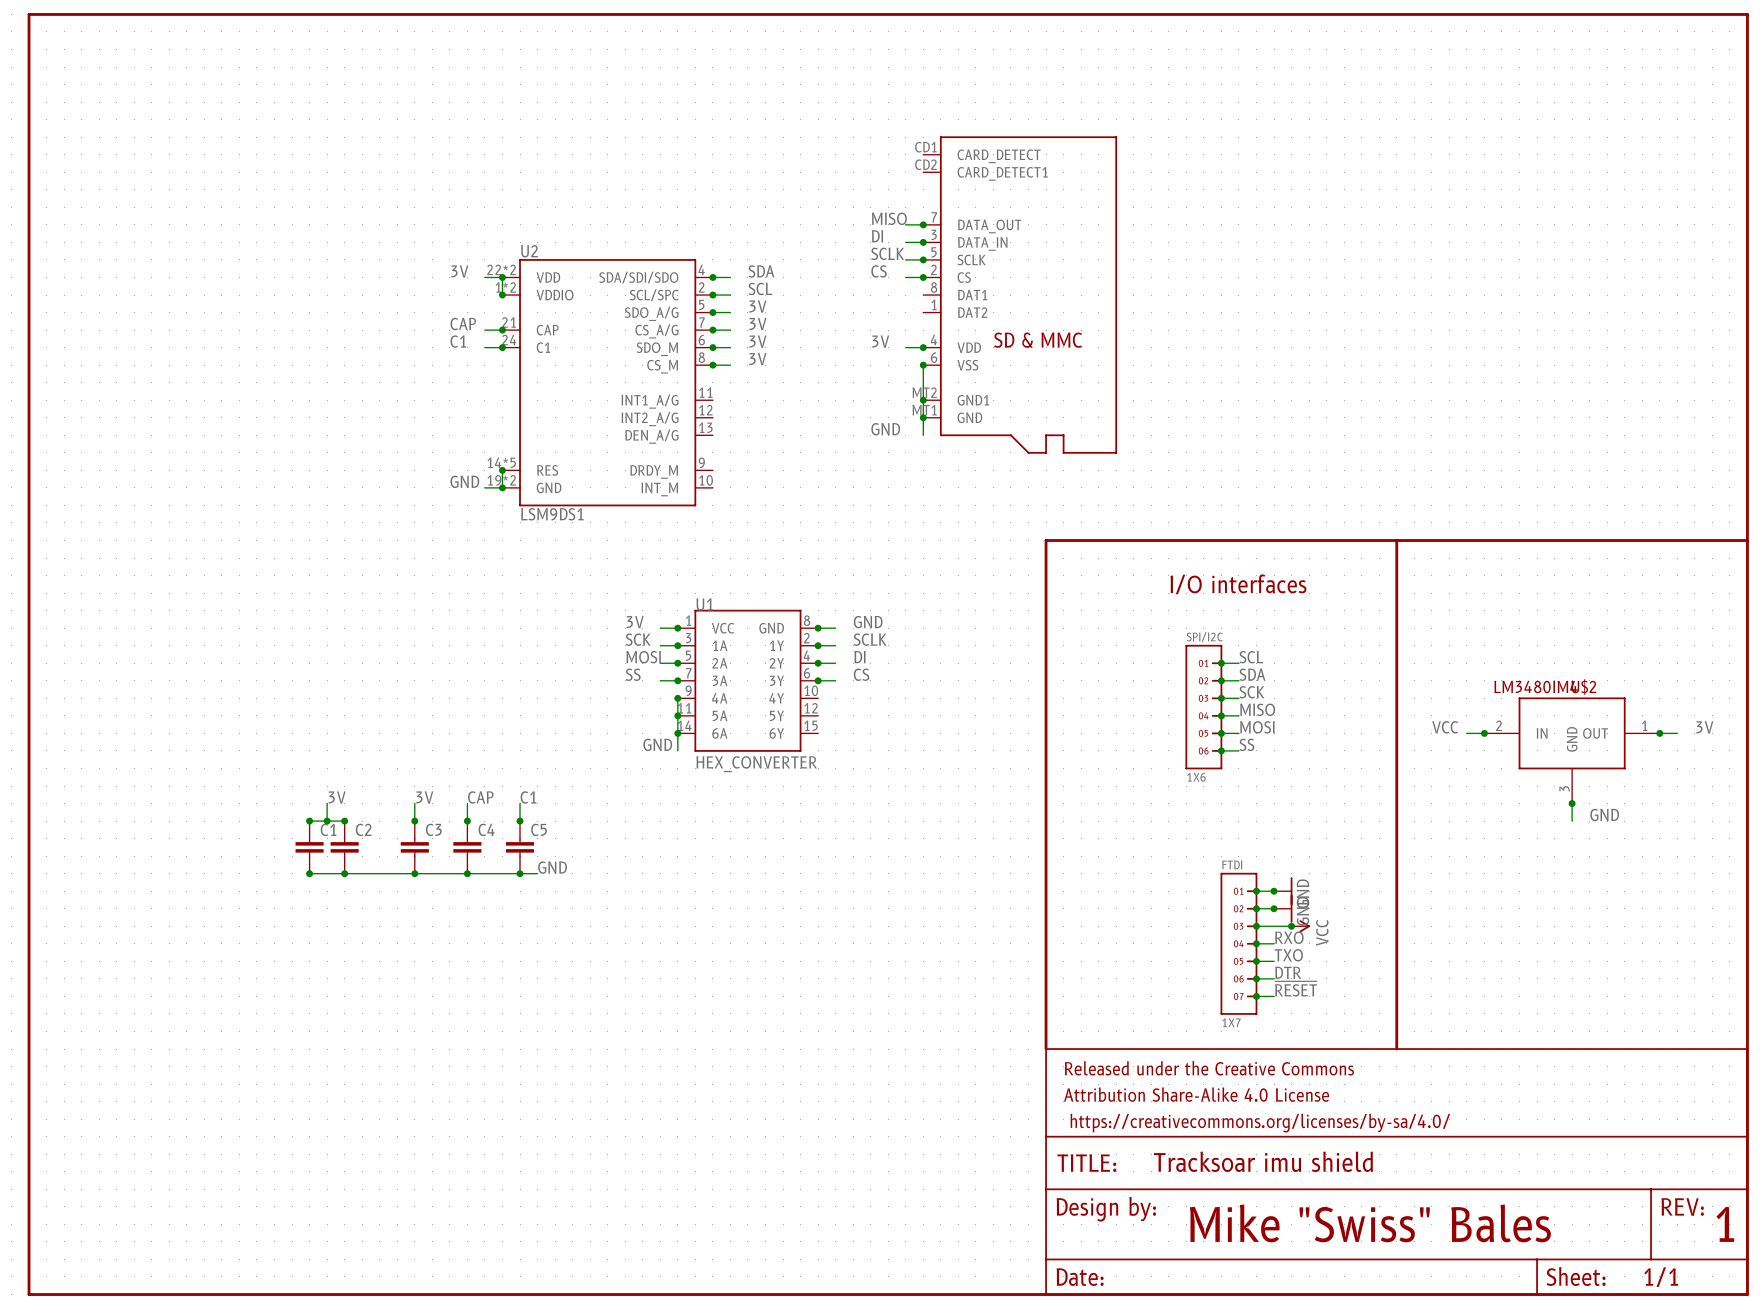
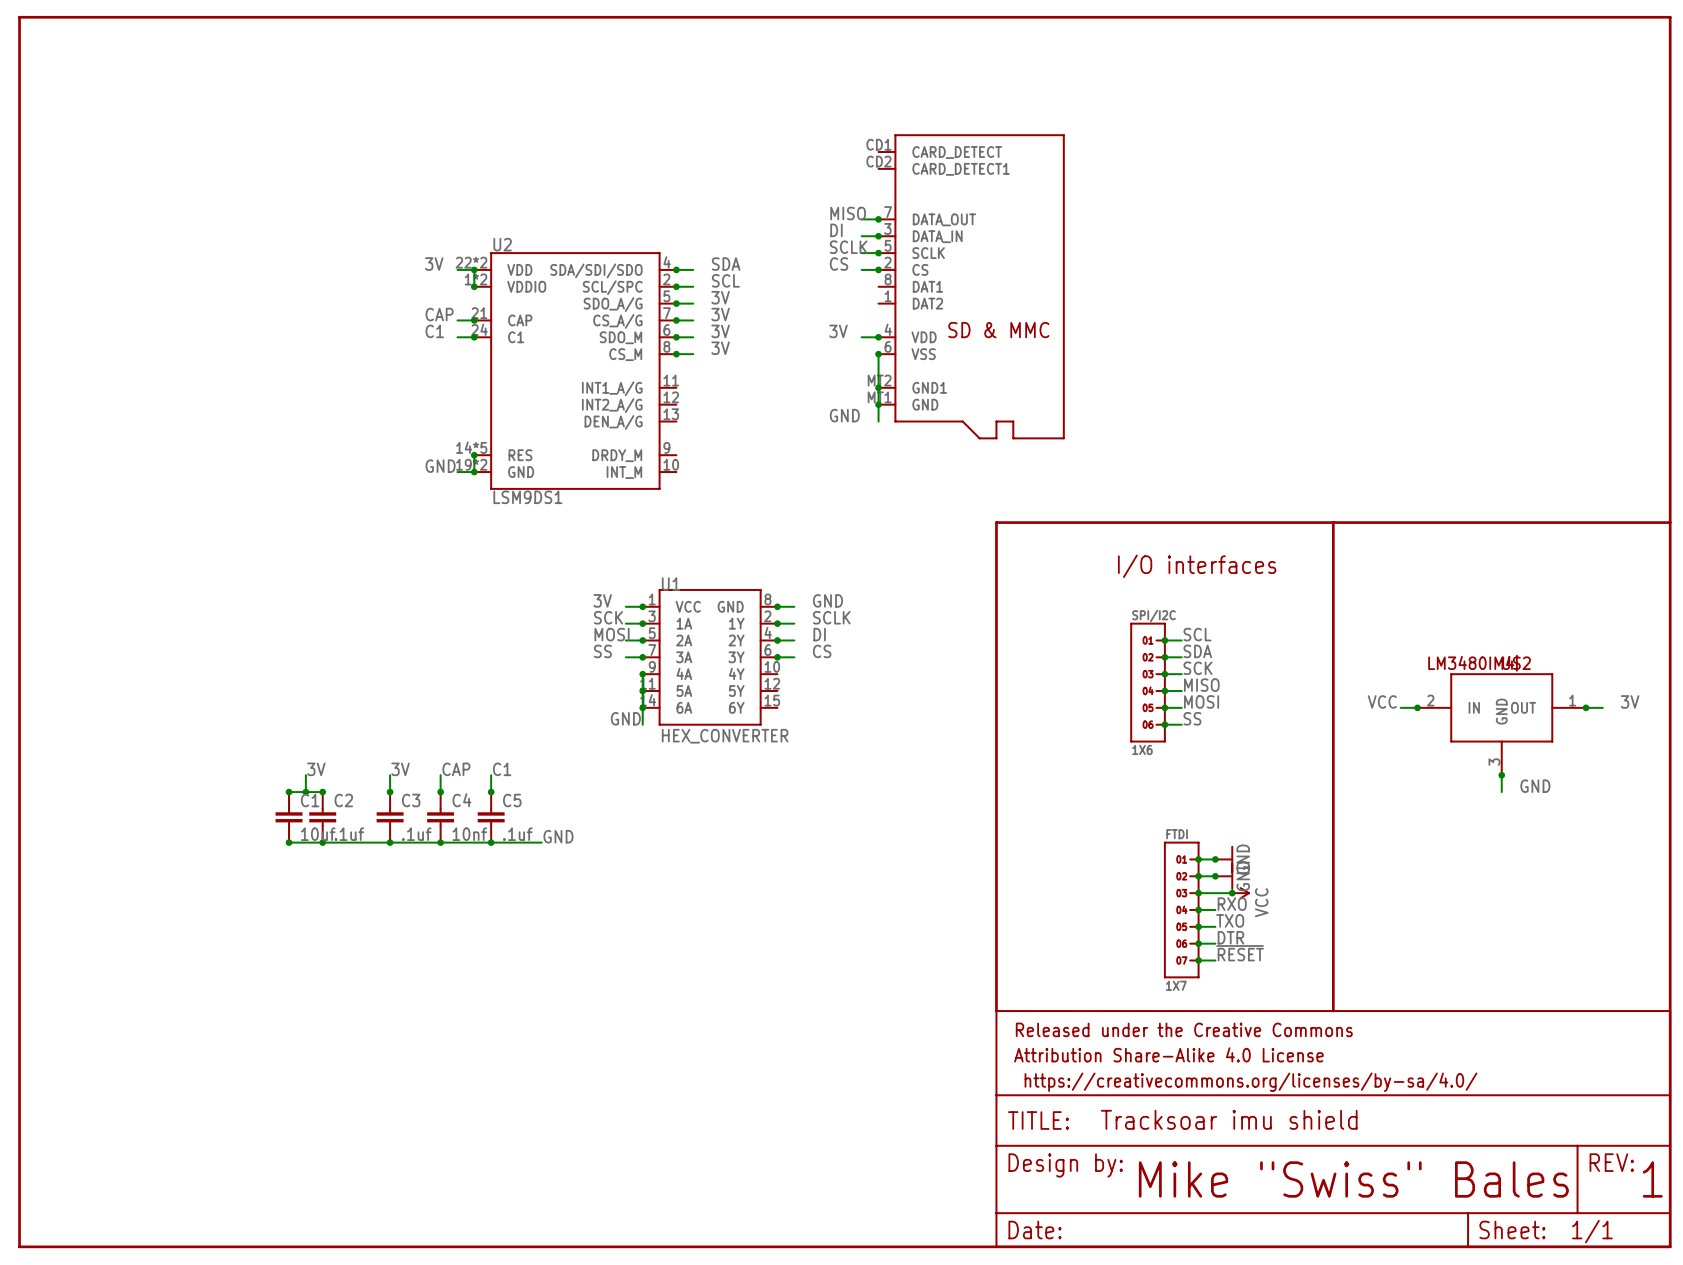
C1 value: none -> 10uf (318, 834)
C2 value: none -> .1uf (349, 834)
C3 value: none -> .1uf (416, 834)
C4 value: none -> 10nf (469, 834)
C5 value: none -> .1uf (517, 834)
label position: GND (552, 867) -> GND (558, 836)
wire: none -> (507, 842) (541, 842)

